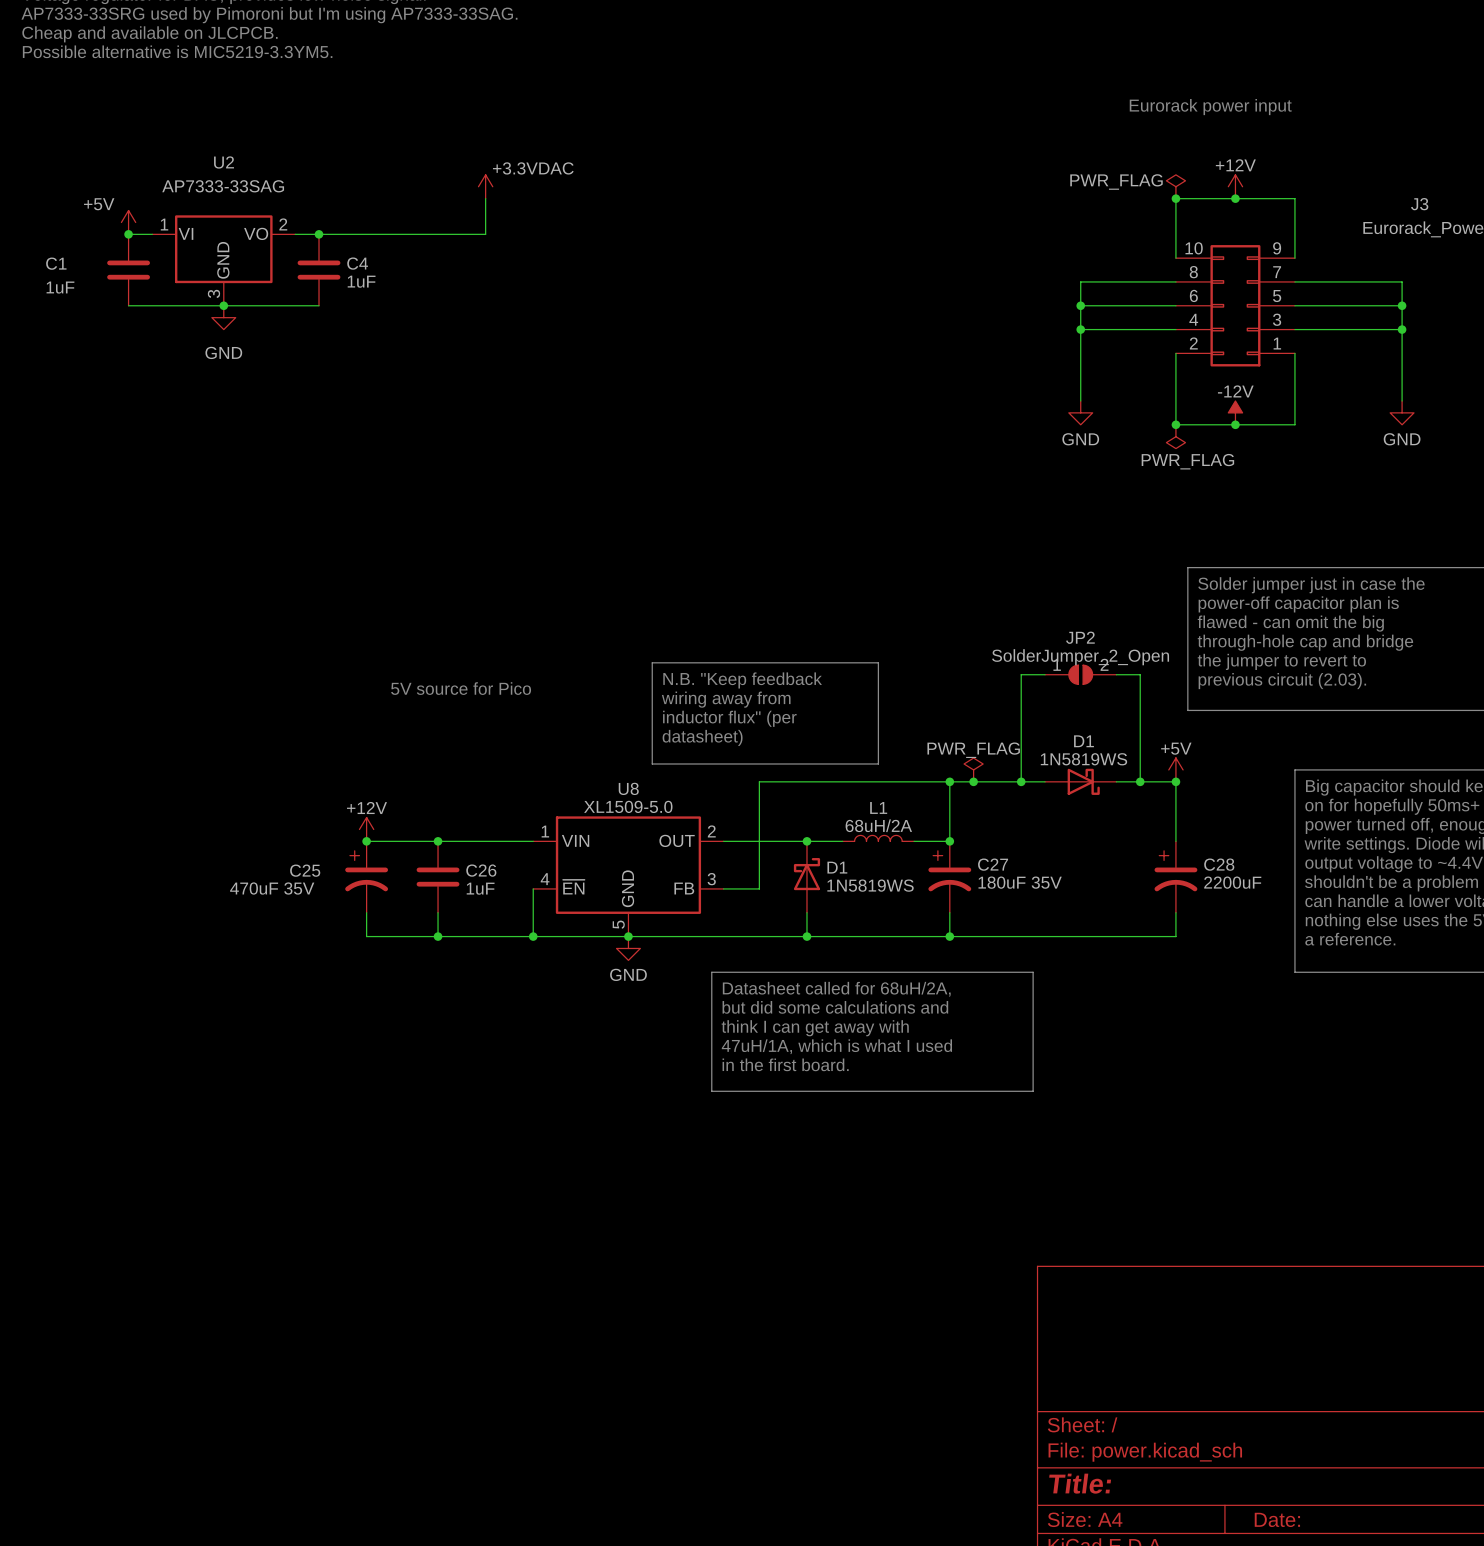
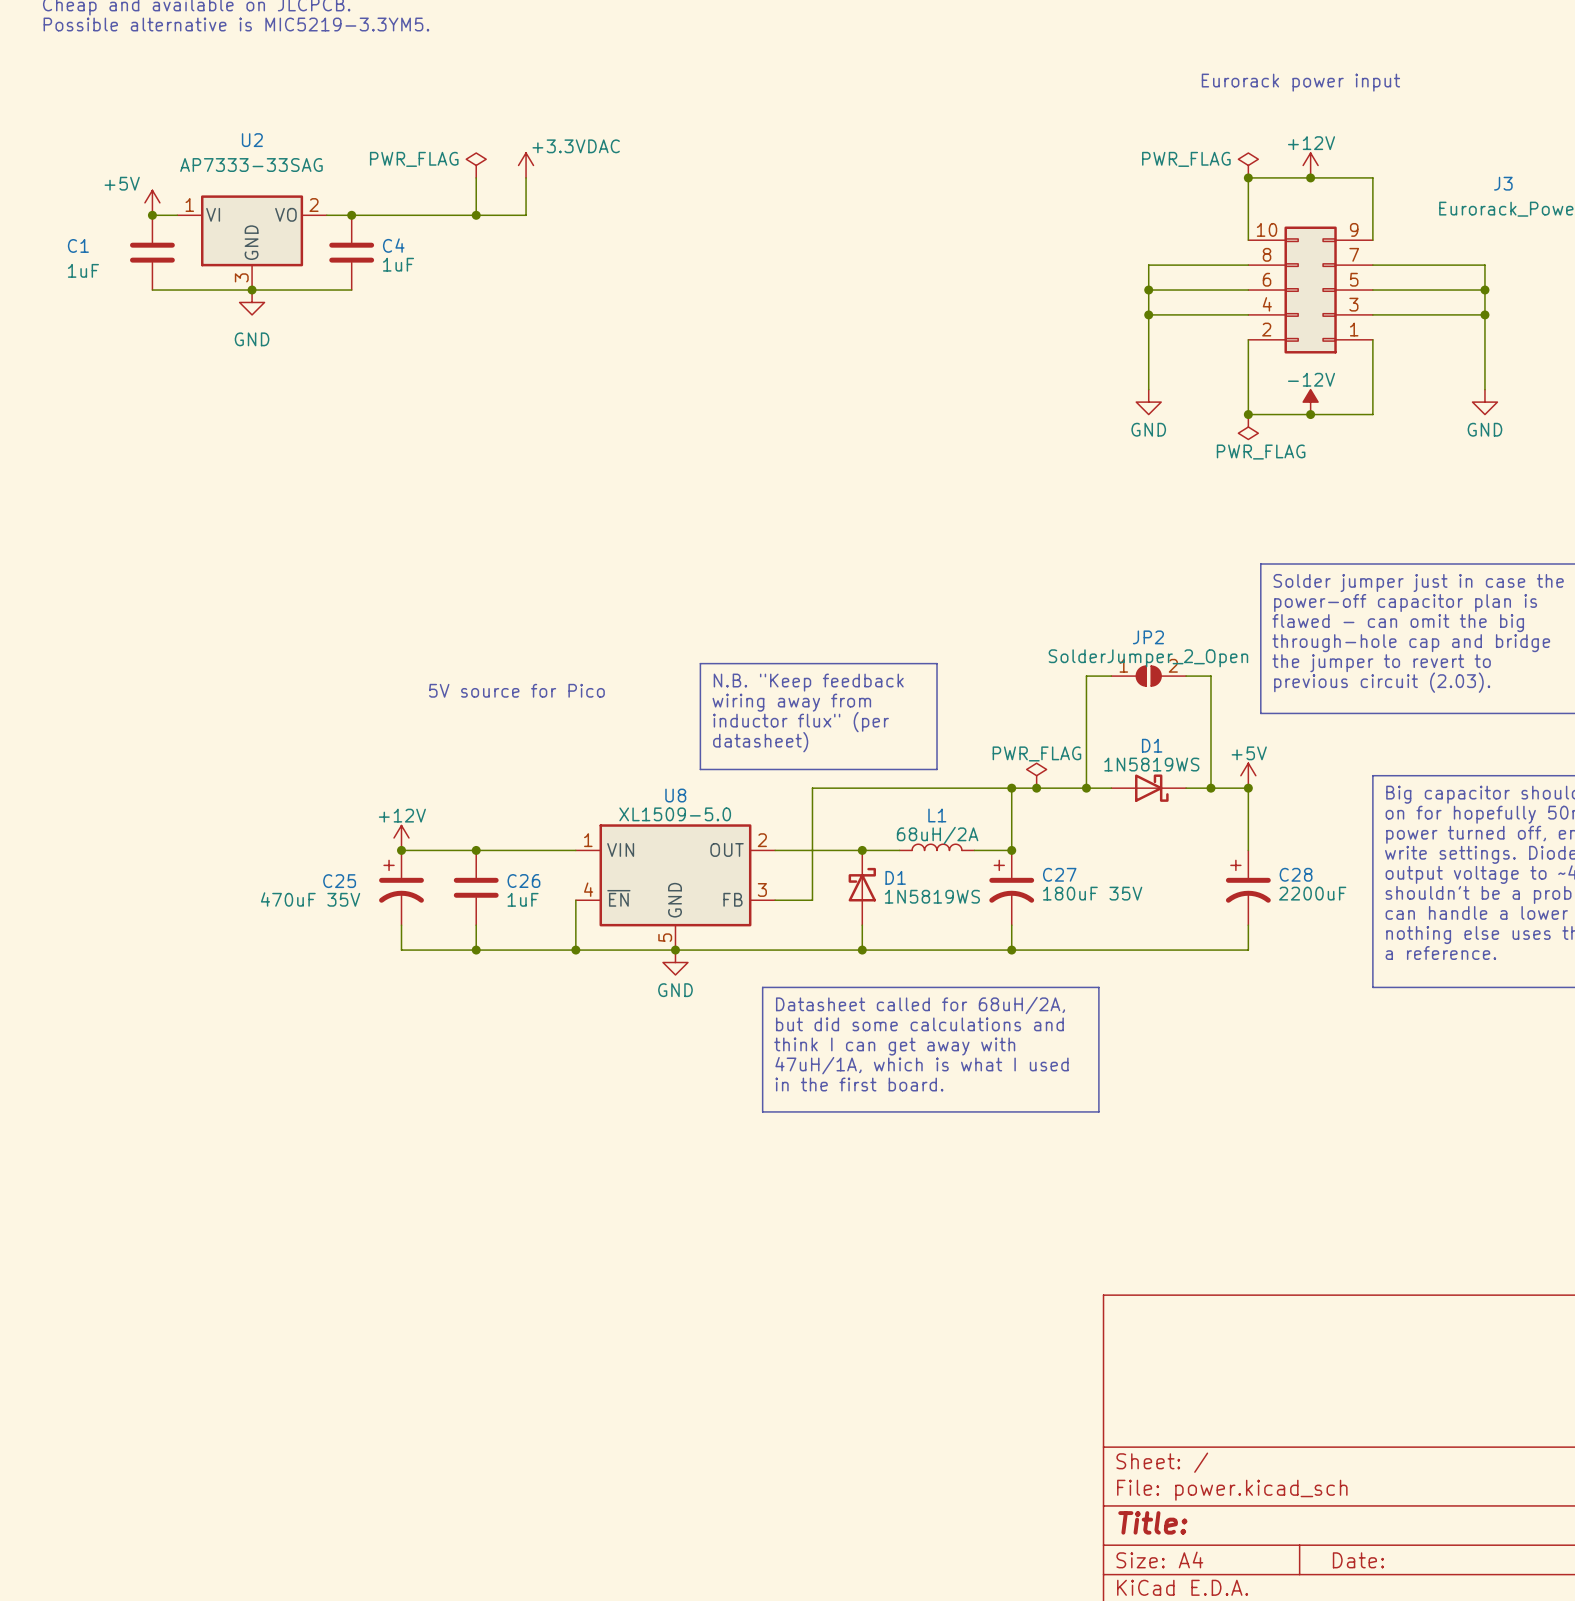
power symbol: none -> PWR_FLAG (476, 165)
wire: none -> (476, 177) (476, 215)
junction: none -> (476, 215)

